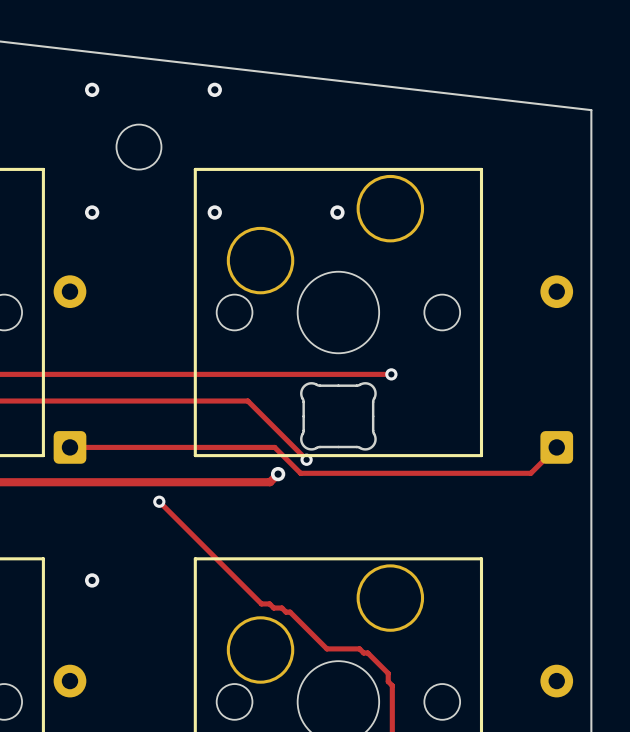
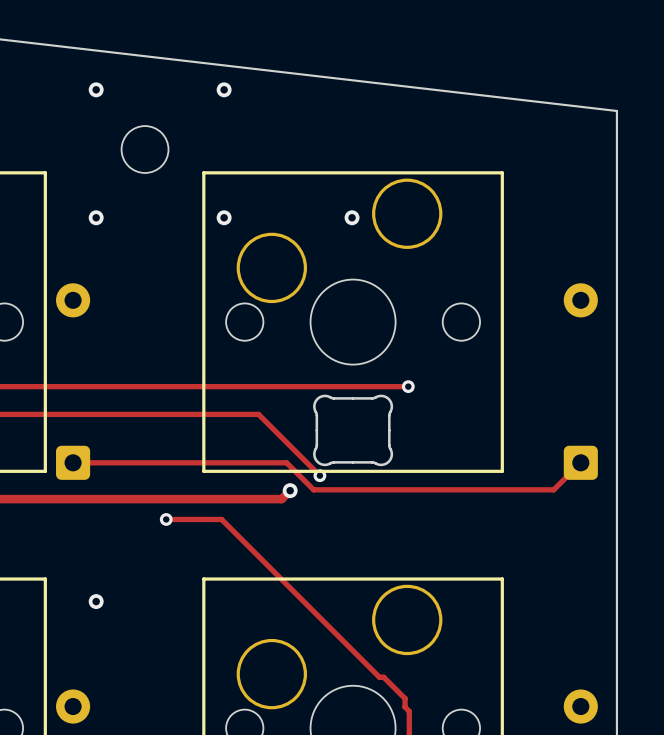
track: (159, 501) (261, 603) (269, 603) (273, 608) (281, 608) (286, 612) (290, 612) (326, 648) (359, 648) -> (166, 519) (221, 519) (375, 672)

